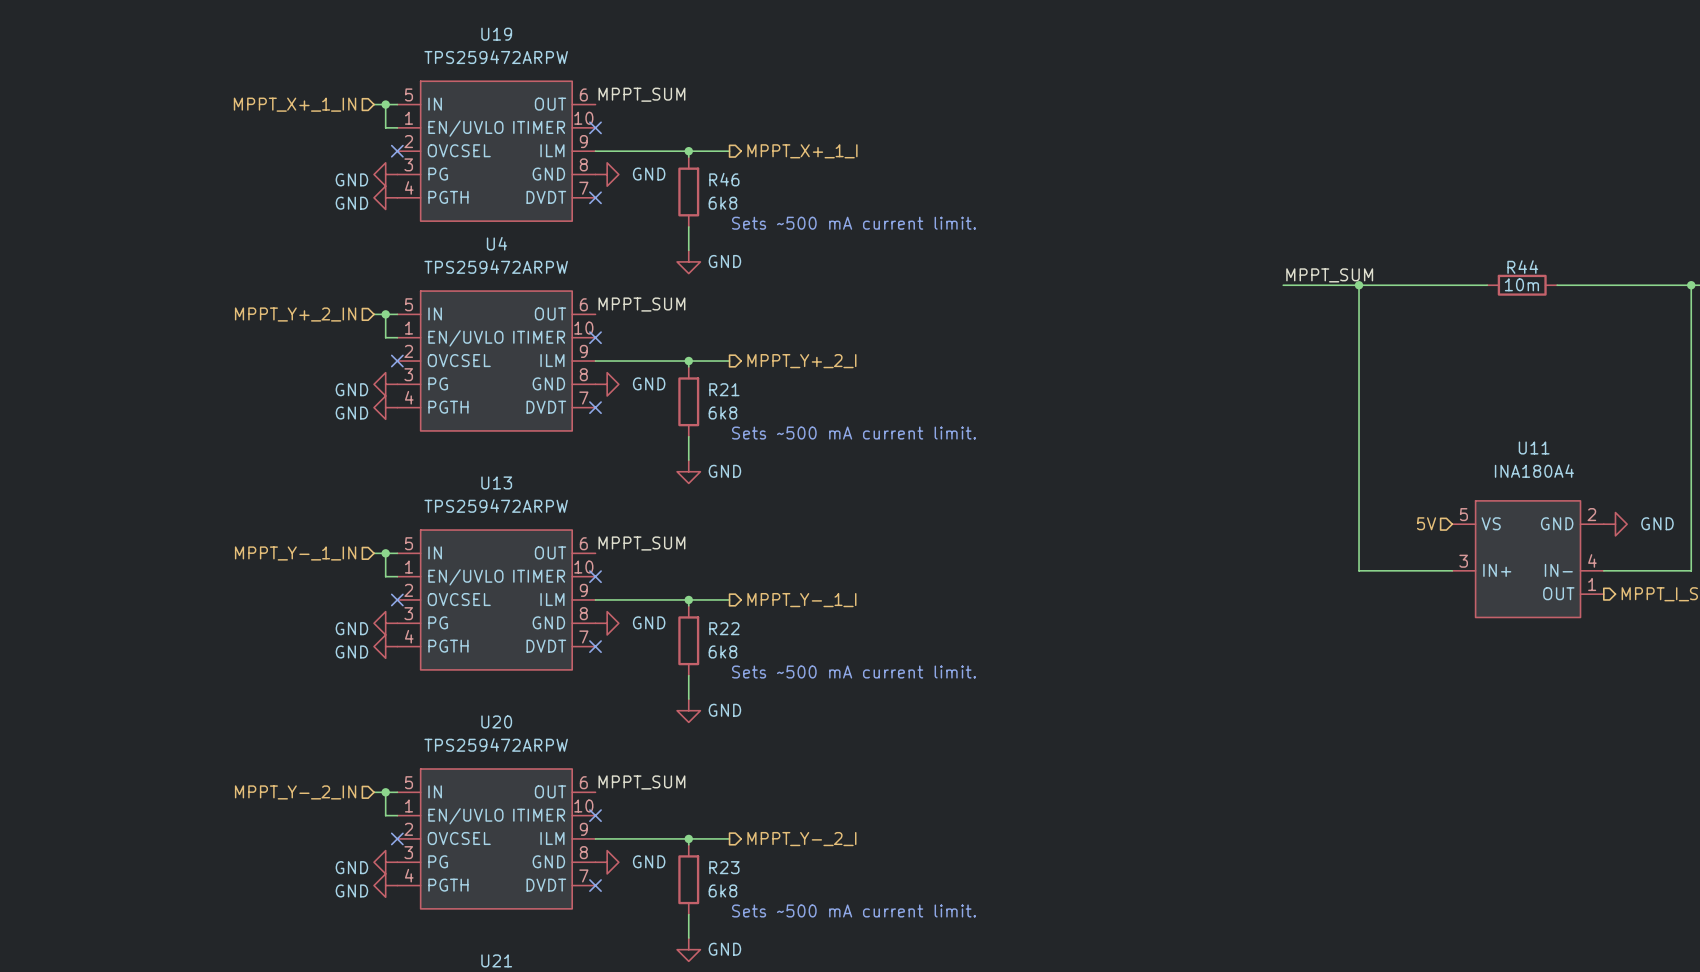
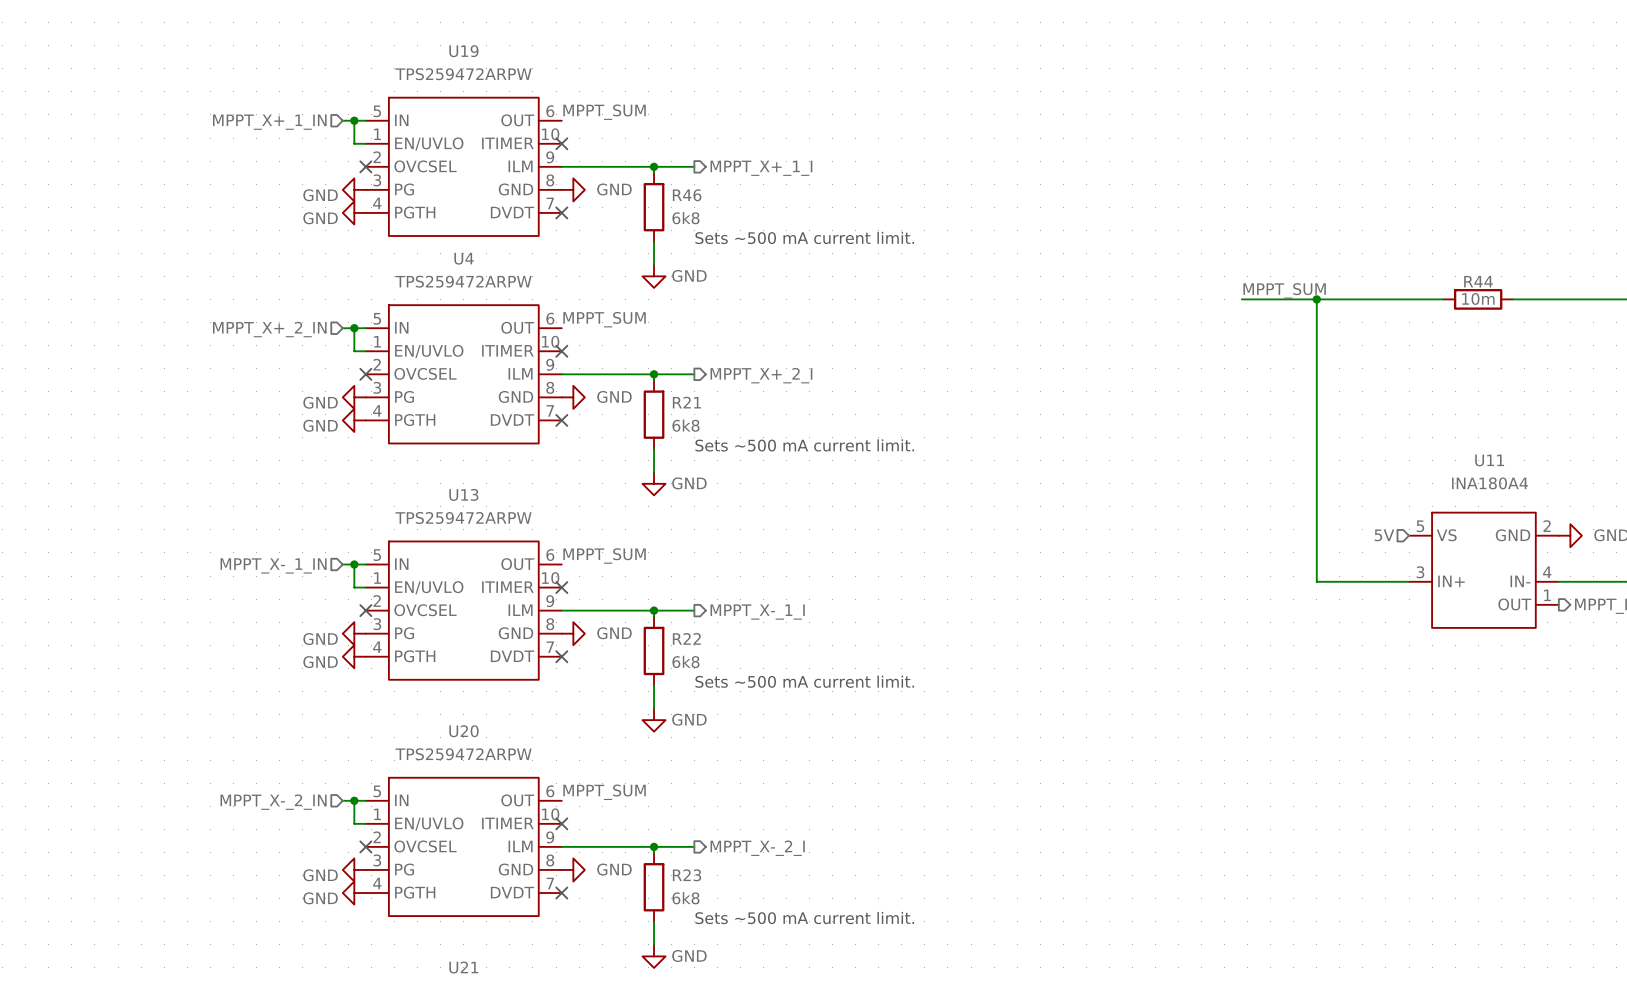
hierarchical label: MPPT_Y+_2_IN (295, 314) -> MPPT_X+_2_IN (269, 329)
hierarchical label: MPPT_Y+_2_I (801, 361) -> MPPT_X+_2_I (761, 375)
hierarchical label: MPPT_Y-_1_IN (295, 553) -> MPPT_X-_1_IN (273, 565)
hierarchical label: MPPT_Y-_1_I (801, 600) -> MPPT_X-_1_I (757, 612)
hierarchical label: MPPT_Y-_2_IN (295, 792) -> MPPT_X-_2_IN (273, 802)
hierarchical label: MPPT_Y-_2_I (801, 839) -> MPPT_X-_2_I (757, 848)

